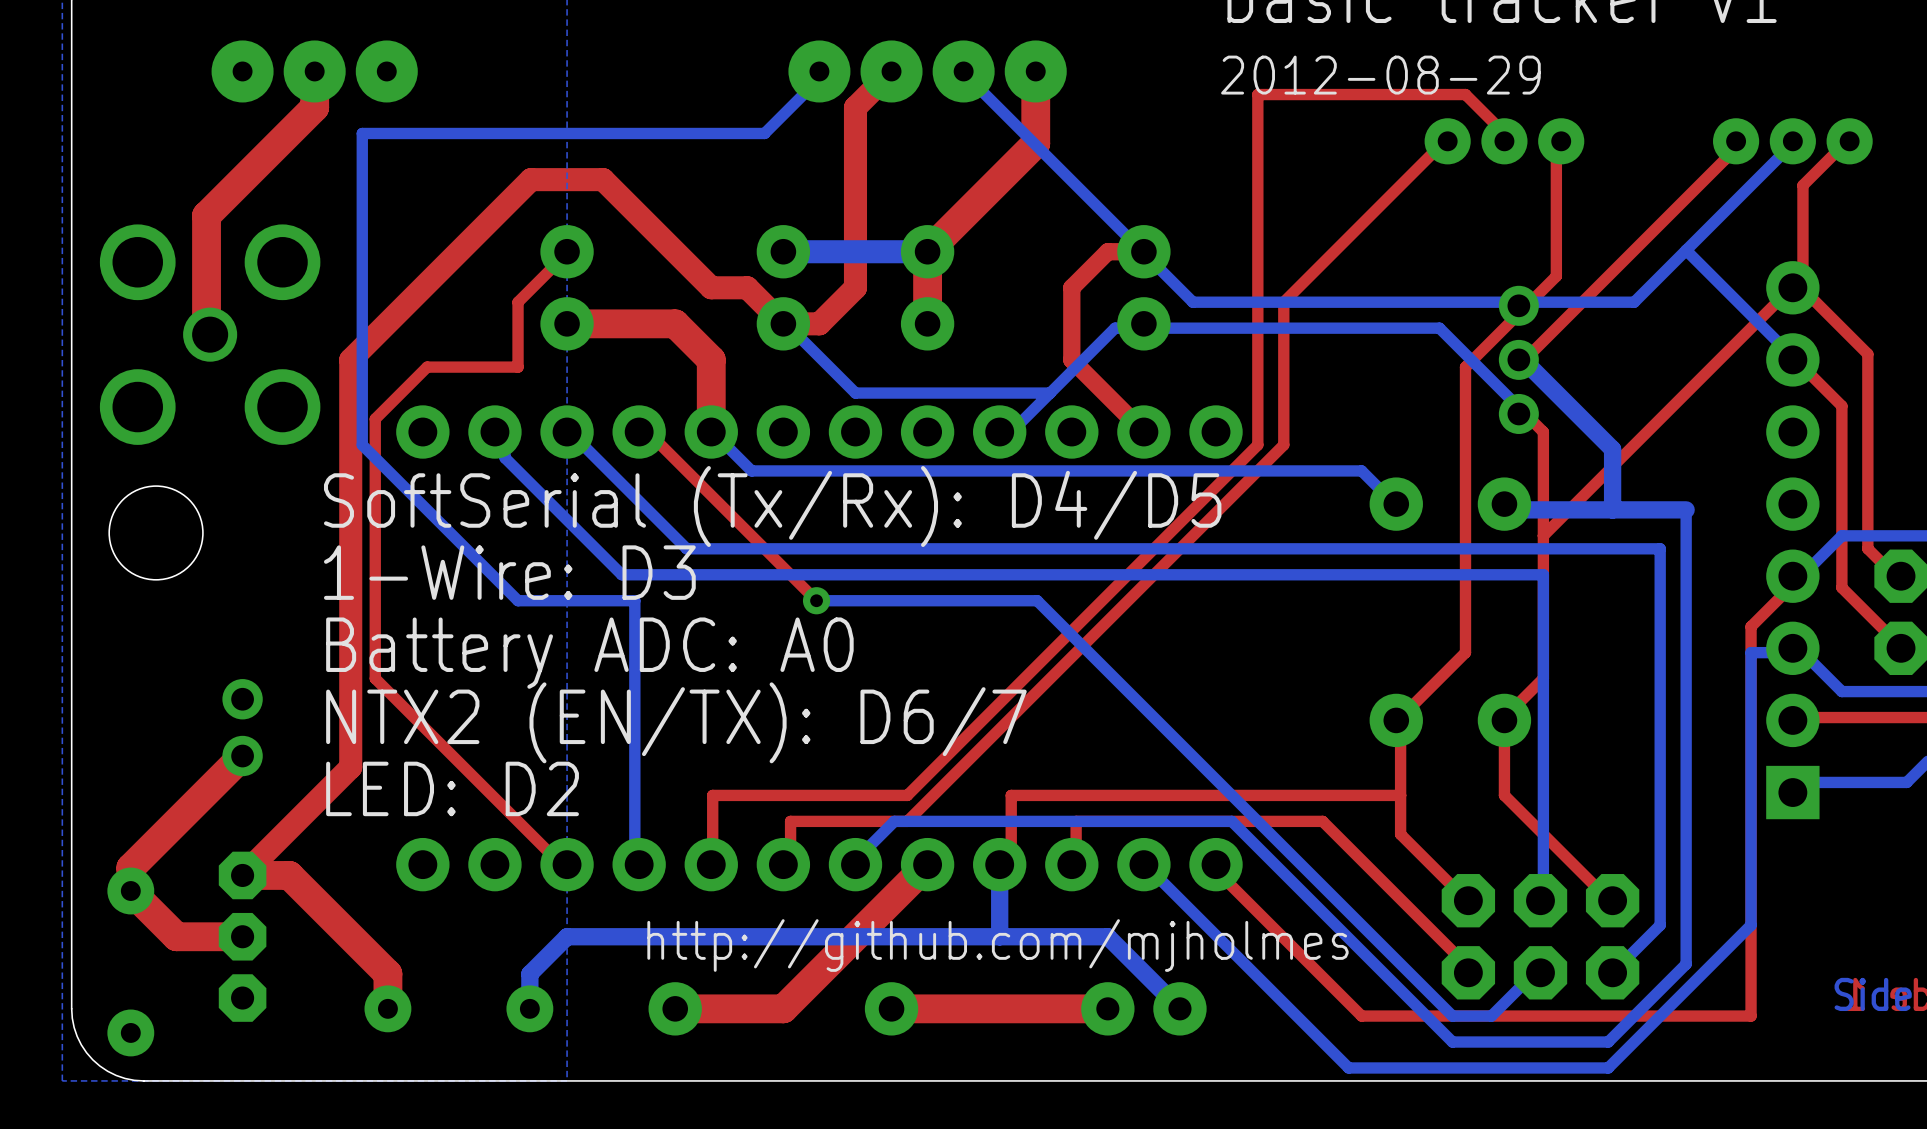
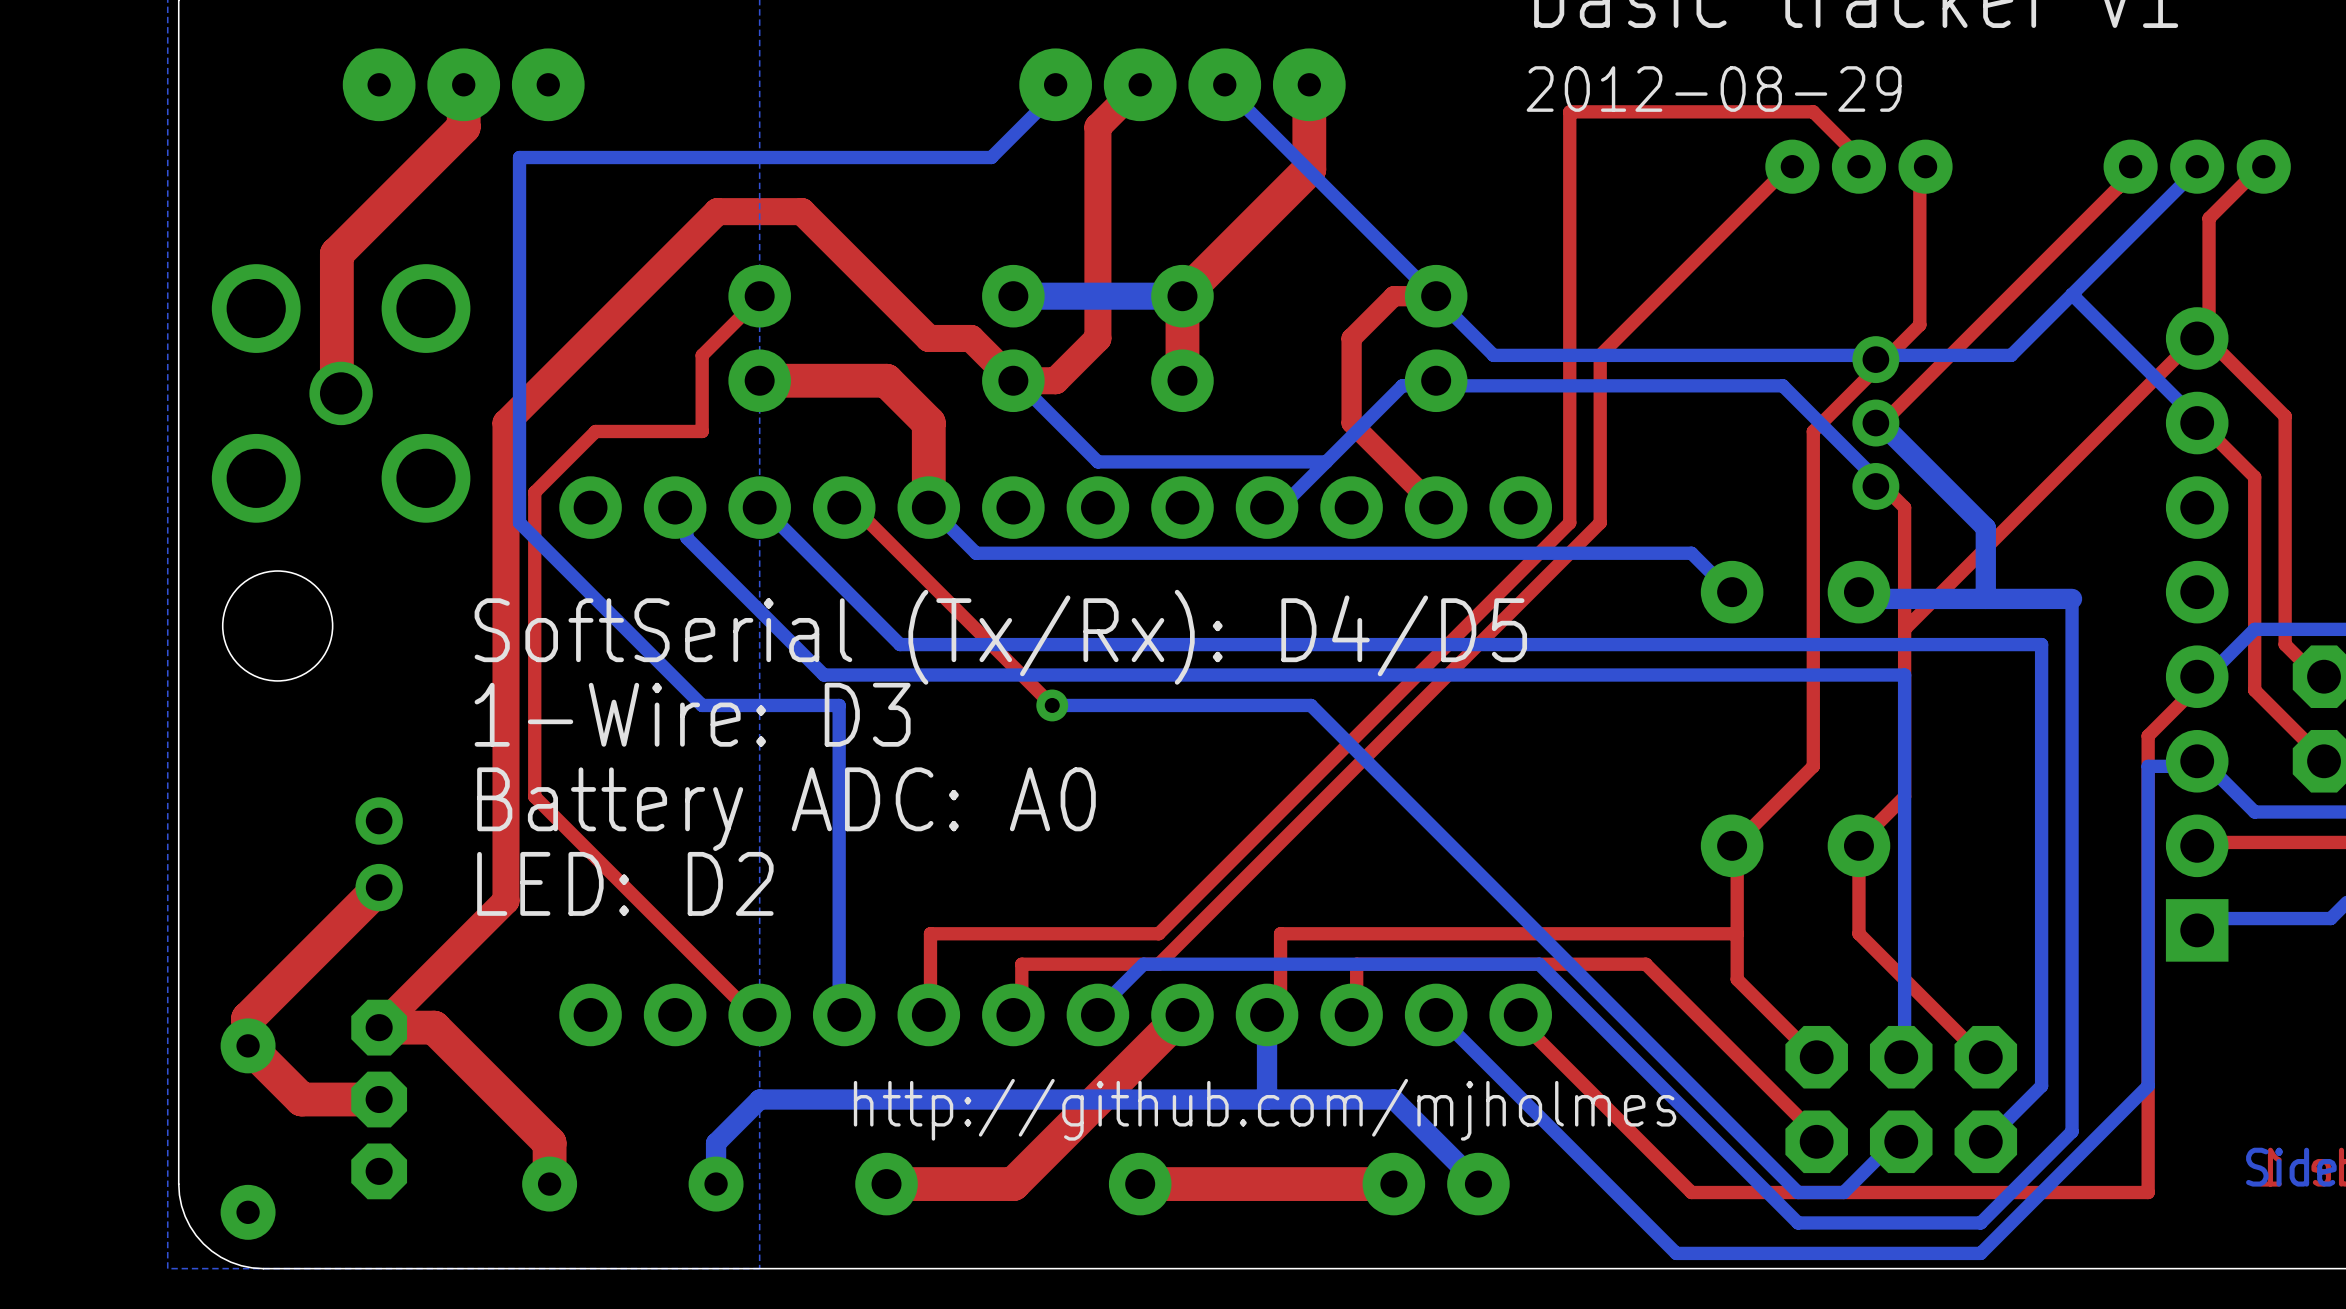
text position: SoftSerial (Tx/Rx): D4/D5 (772, 506) -> SoftSerial (Tx/Rx): D4/D5 (1000, 637)
text position: 1-Wire: D3 (509, 572) -> 1-Wire: D3 (692, 714)
text position: Battery ADC: A0 (589, 653) -> Battery ADC: A0 (786, 809)
text: NTX2 (EN/TX): D6/7 (676, 722) -> none
text position: LED: D2 (452, 788) -> LED: D2 (625, 883)

